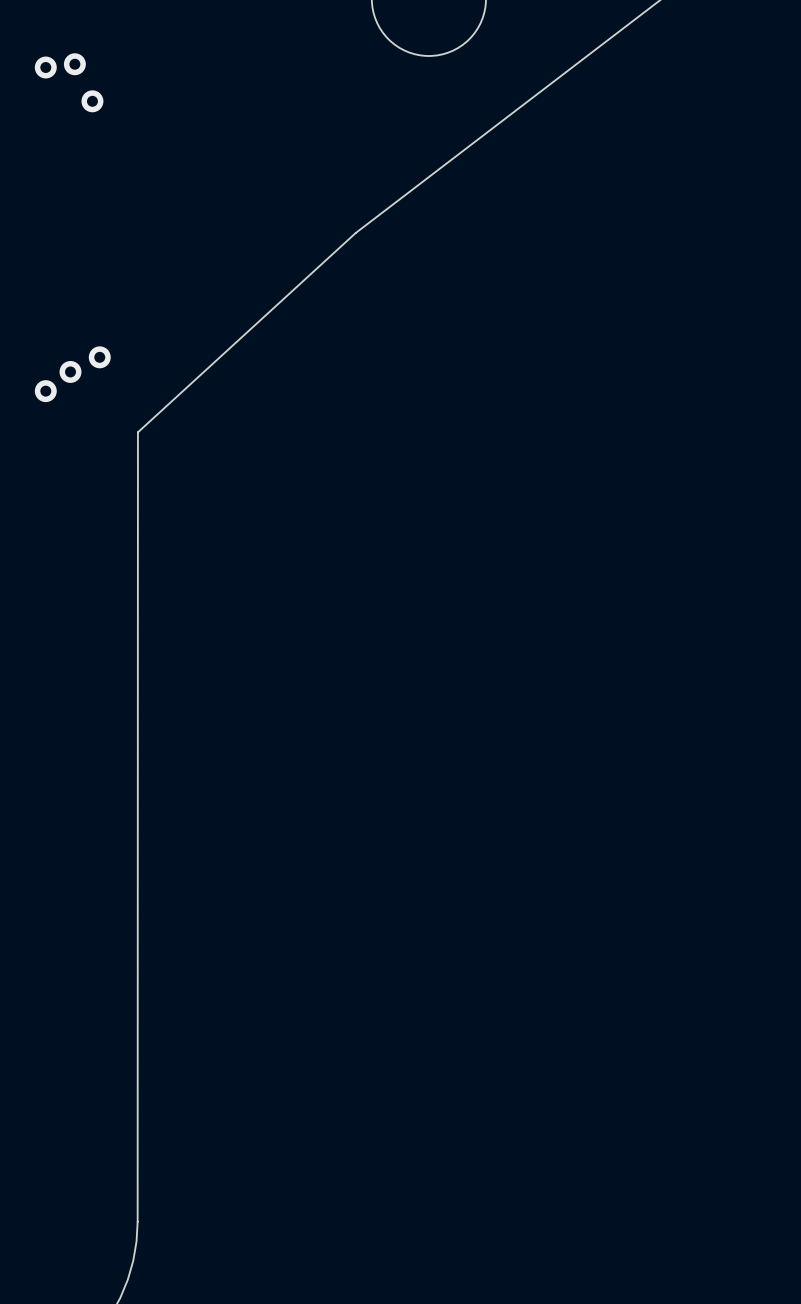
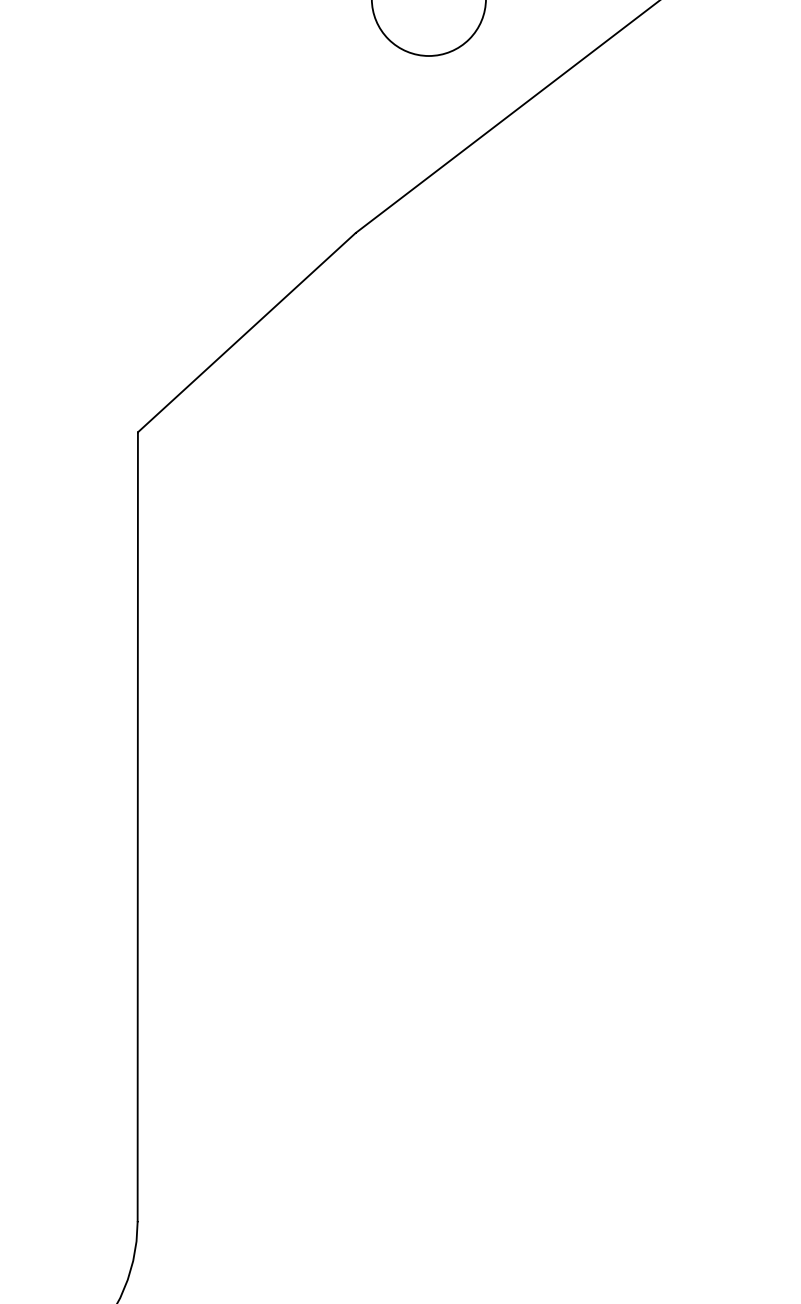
via: (74, 64) -> none
via: (45, 67) -> none
via: (92, 101) -> none
via: (99, 357) -> none
via: (70, 371) -> none
via: (45, 391) -> none

